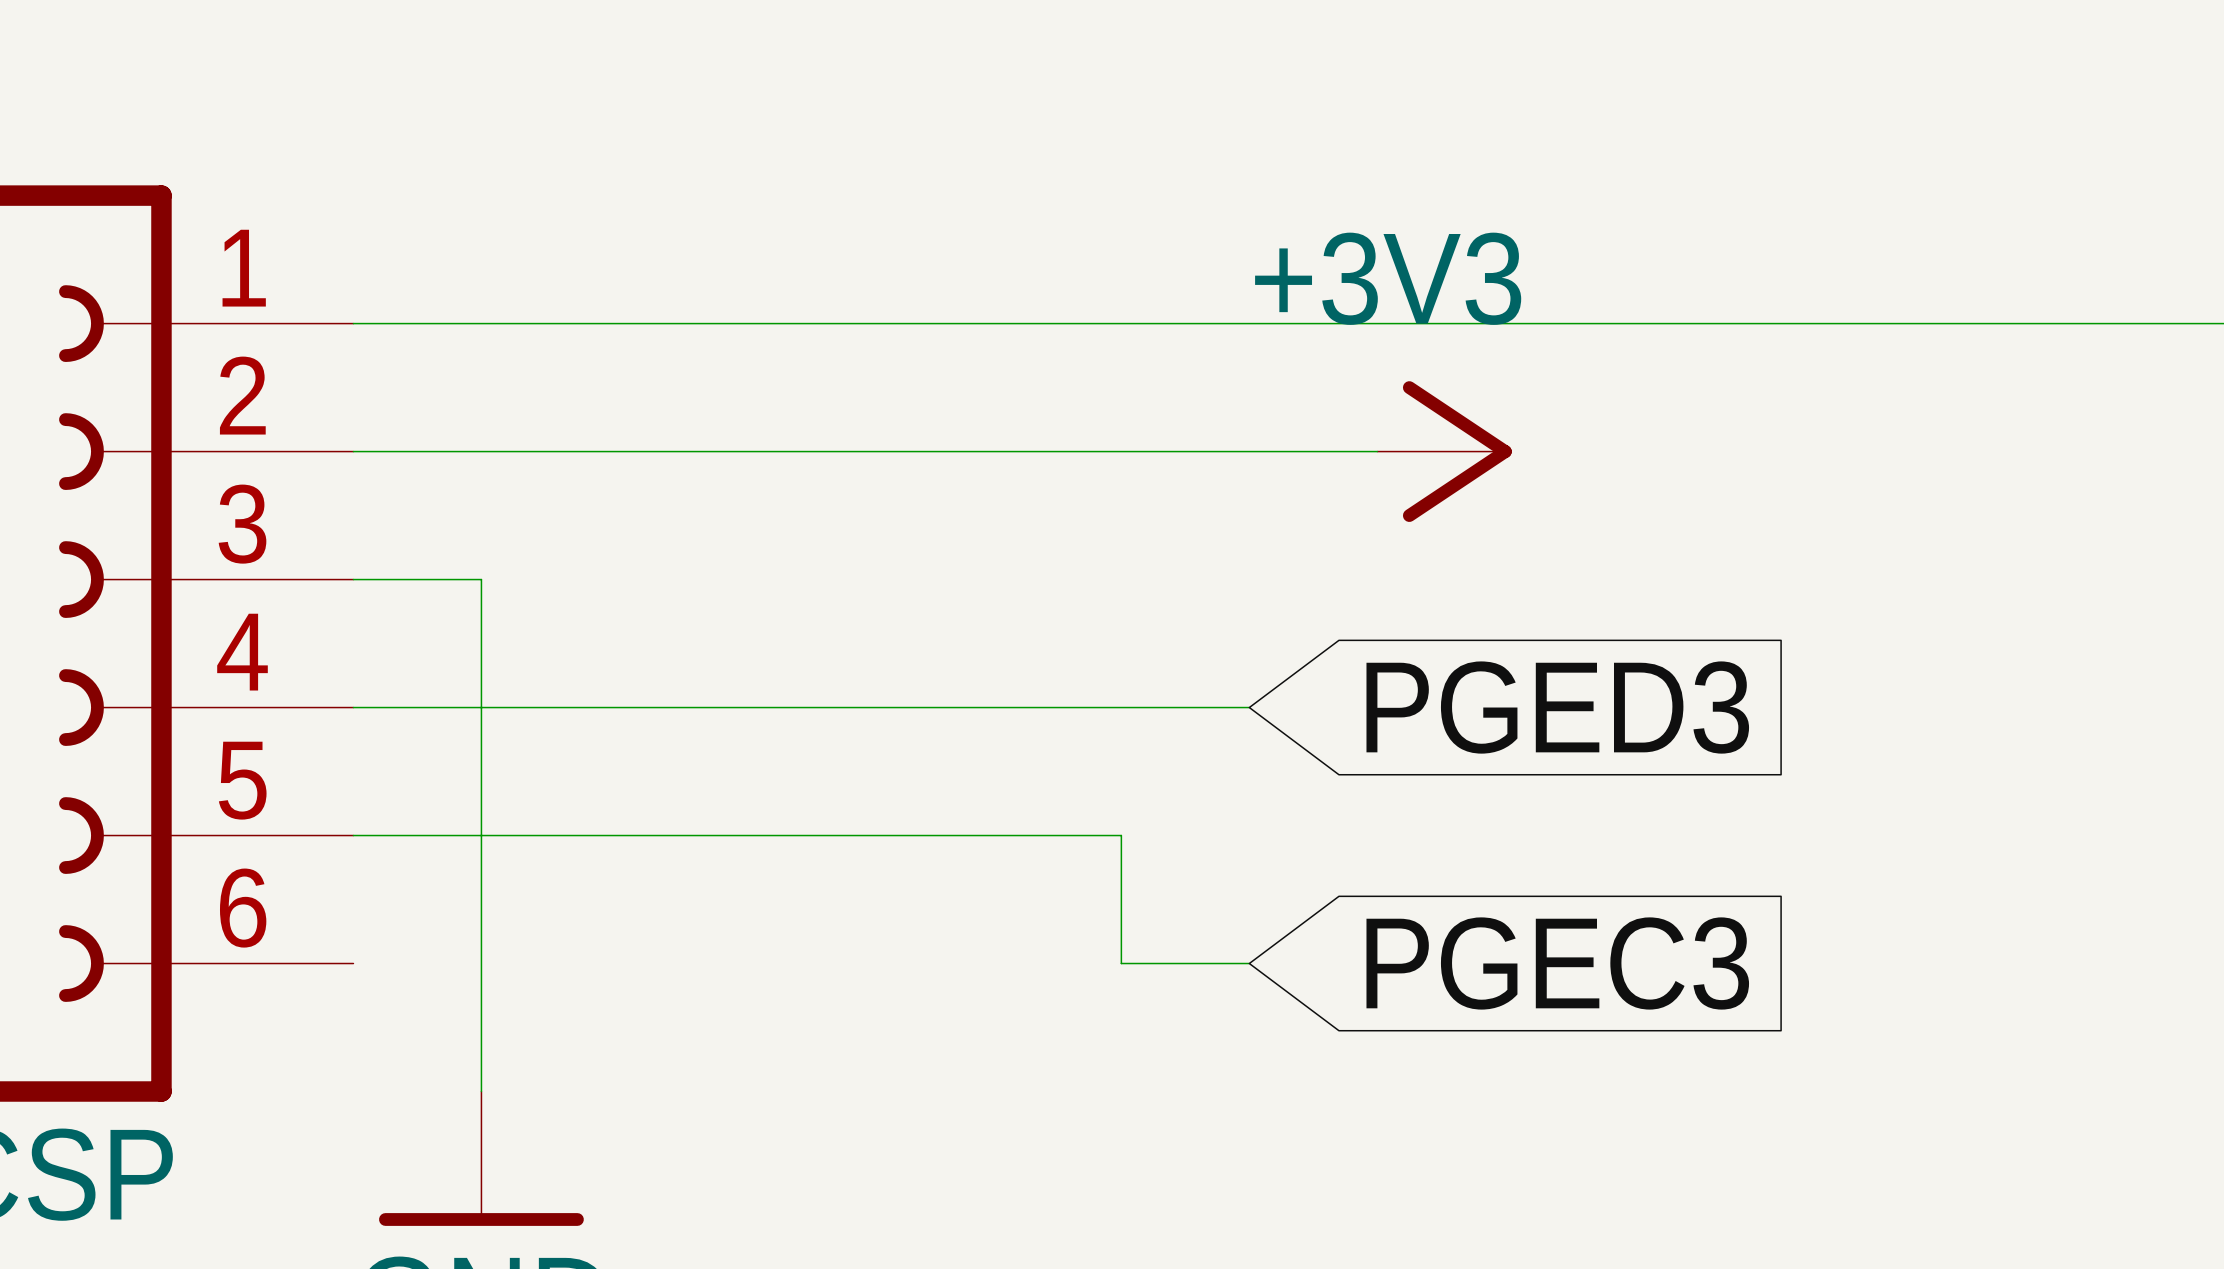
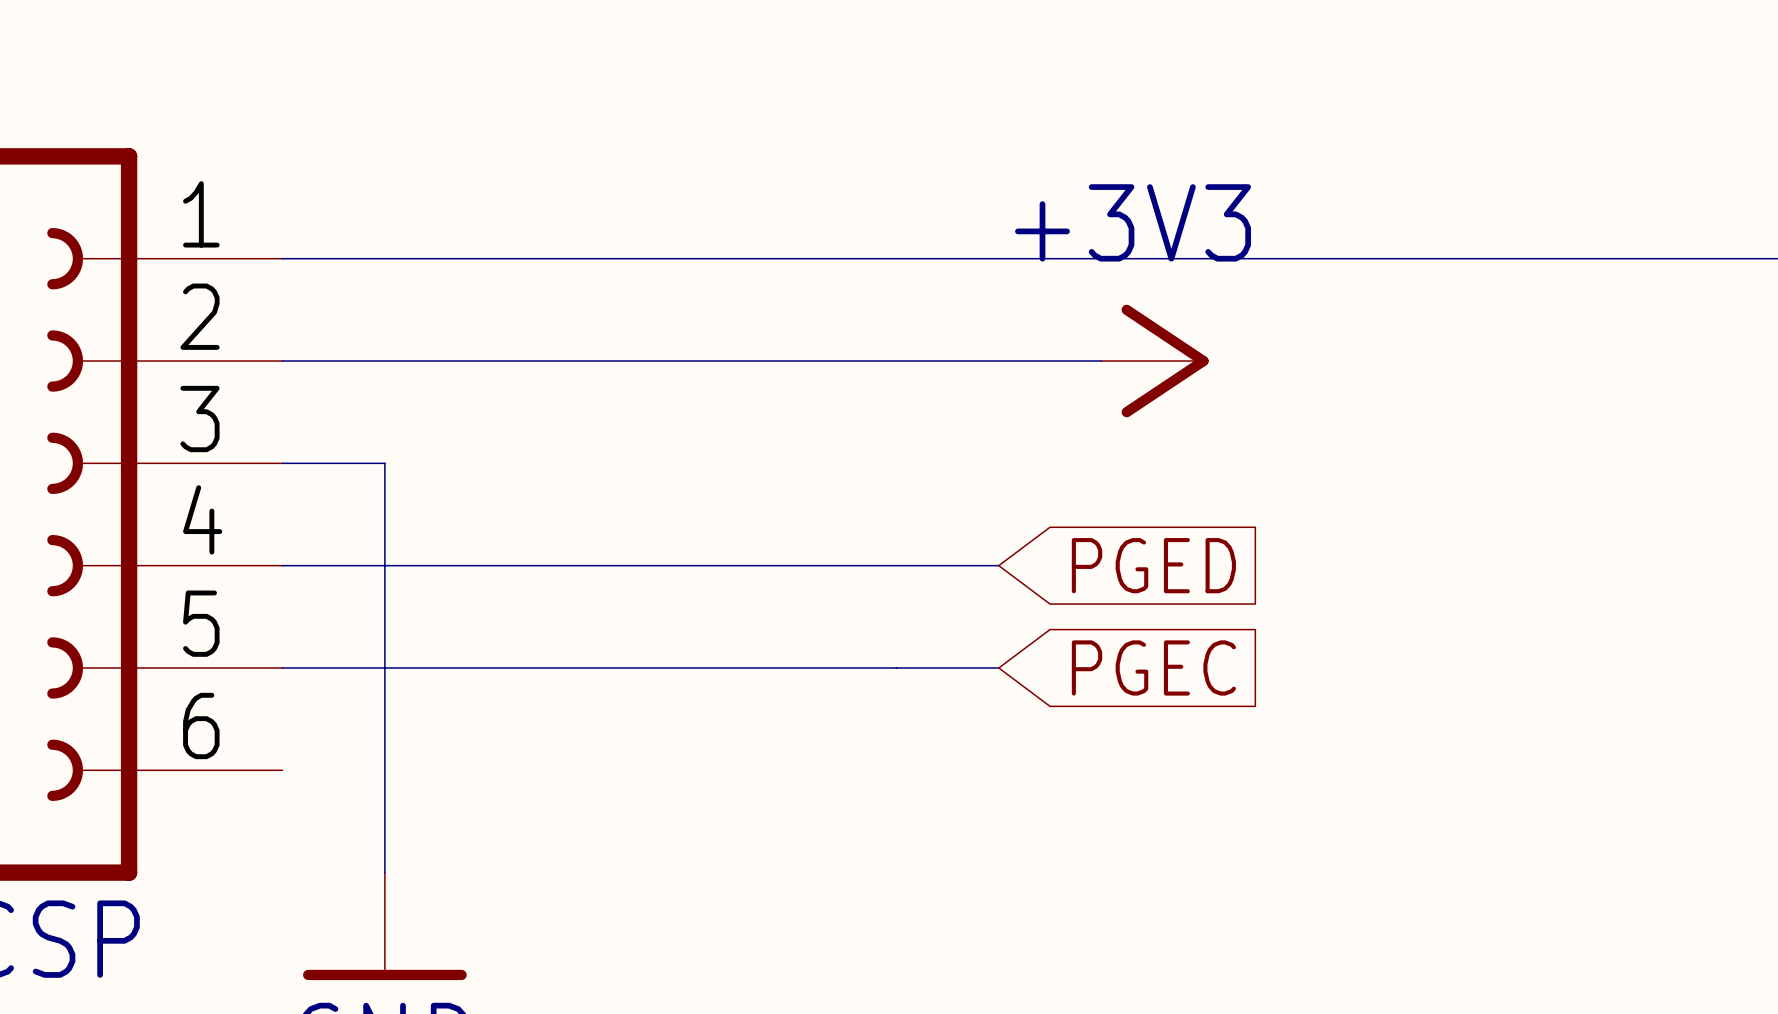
global label: PGED3 (1557, 707) -> PGED (1153, 565)
wire: (1121, 835) (1121, 963) (1249, 963) -> (896, 667) (998, 667)
global label: PGEC3 (1557, 963) -> PGEC (1153, 667)

